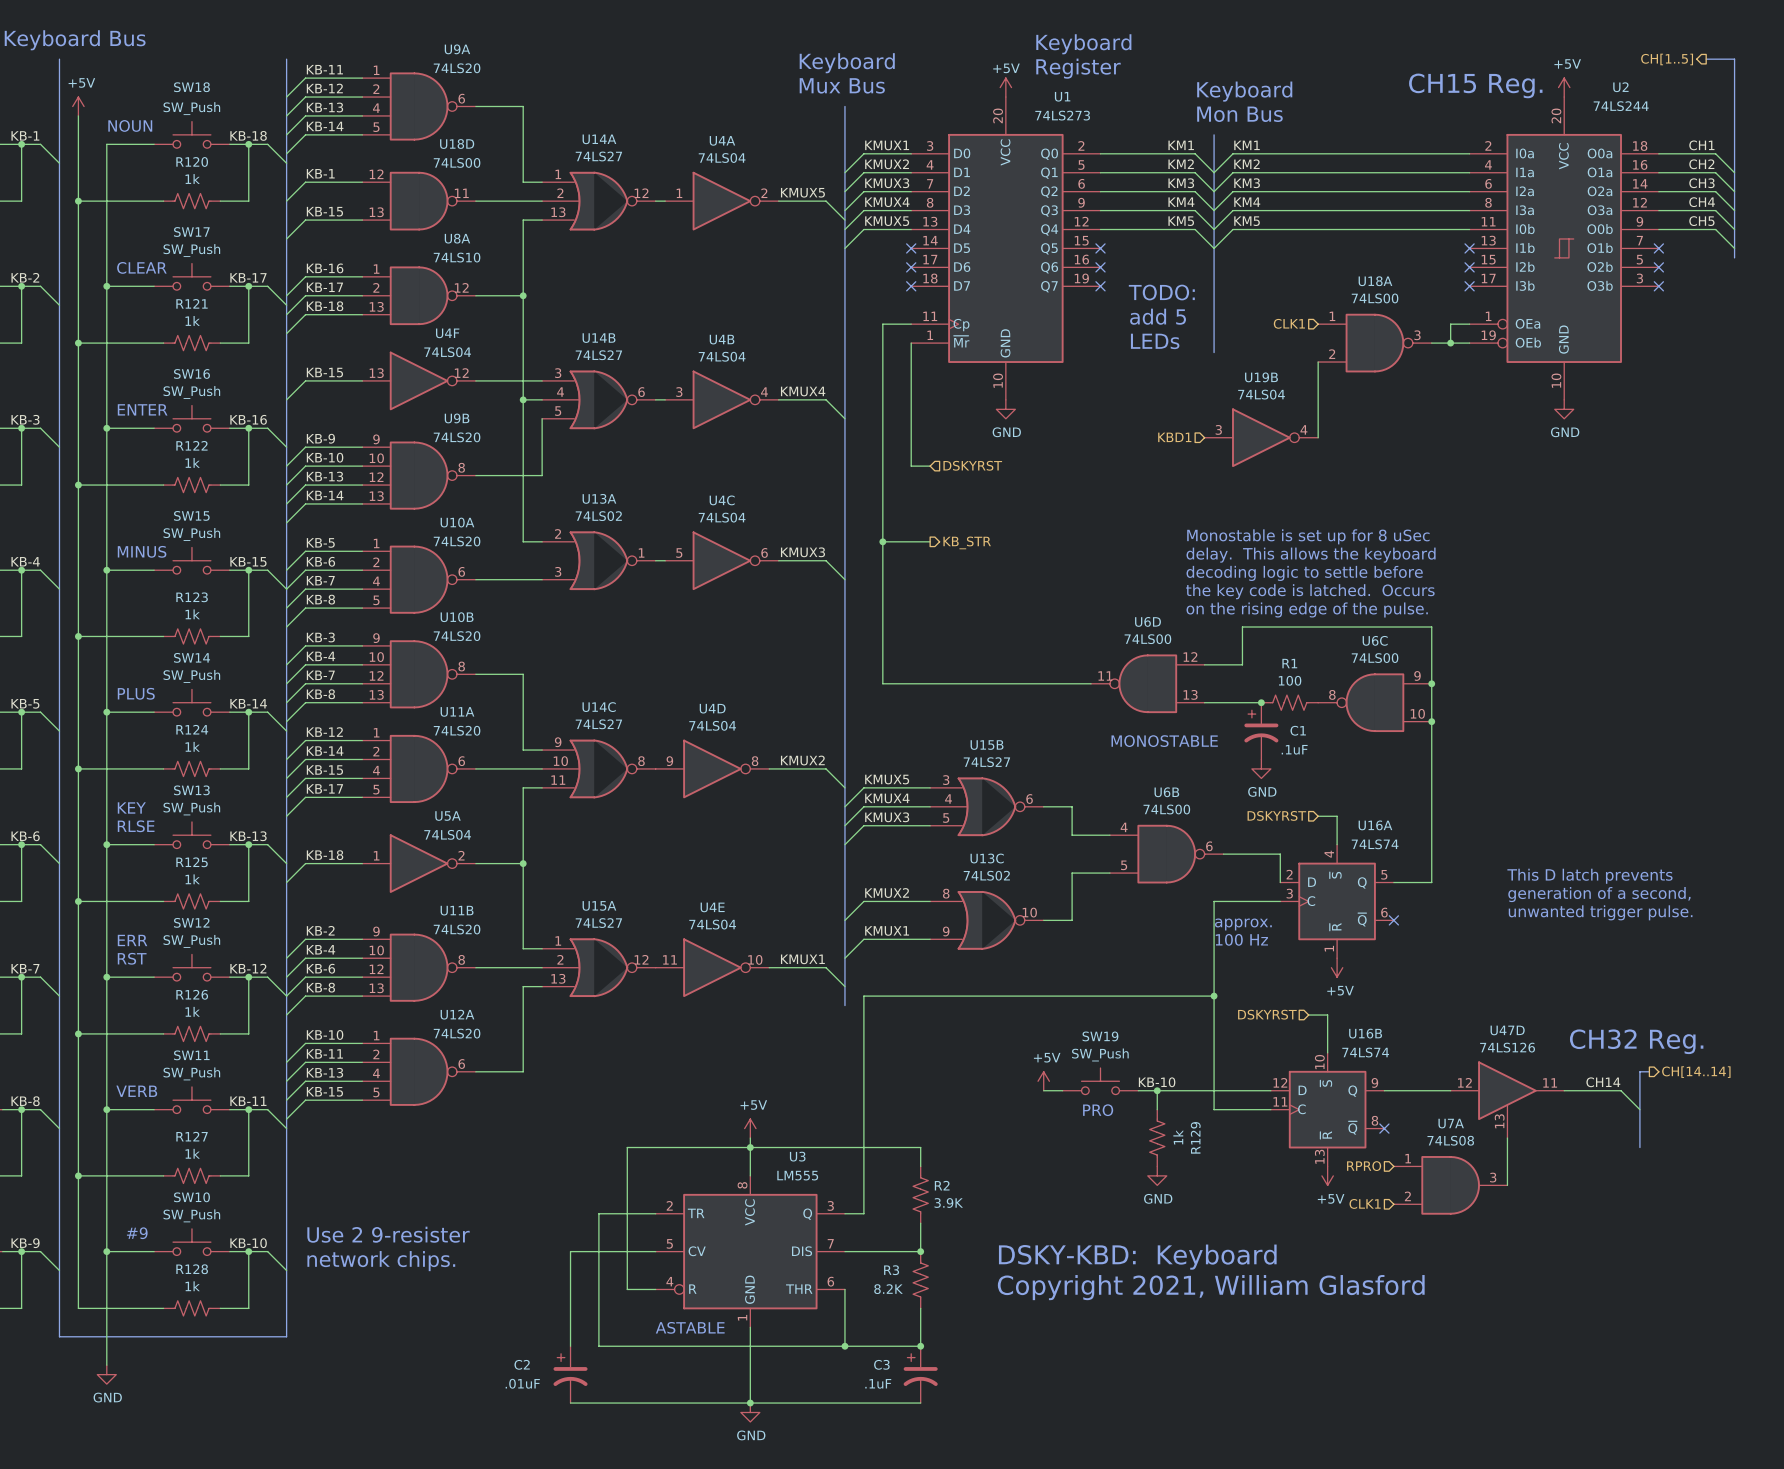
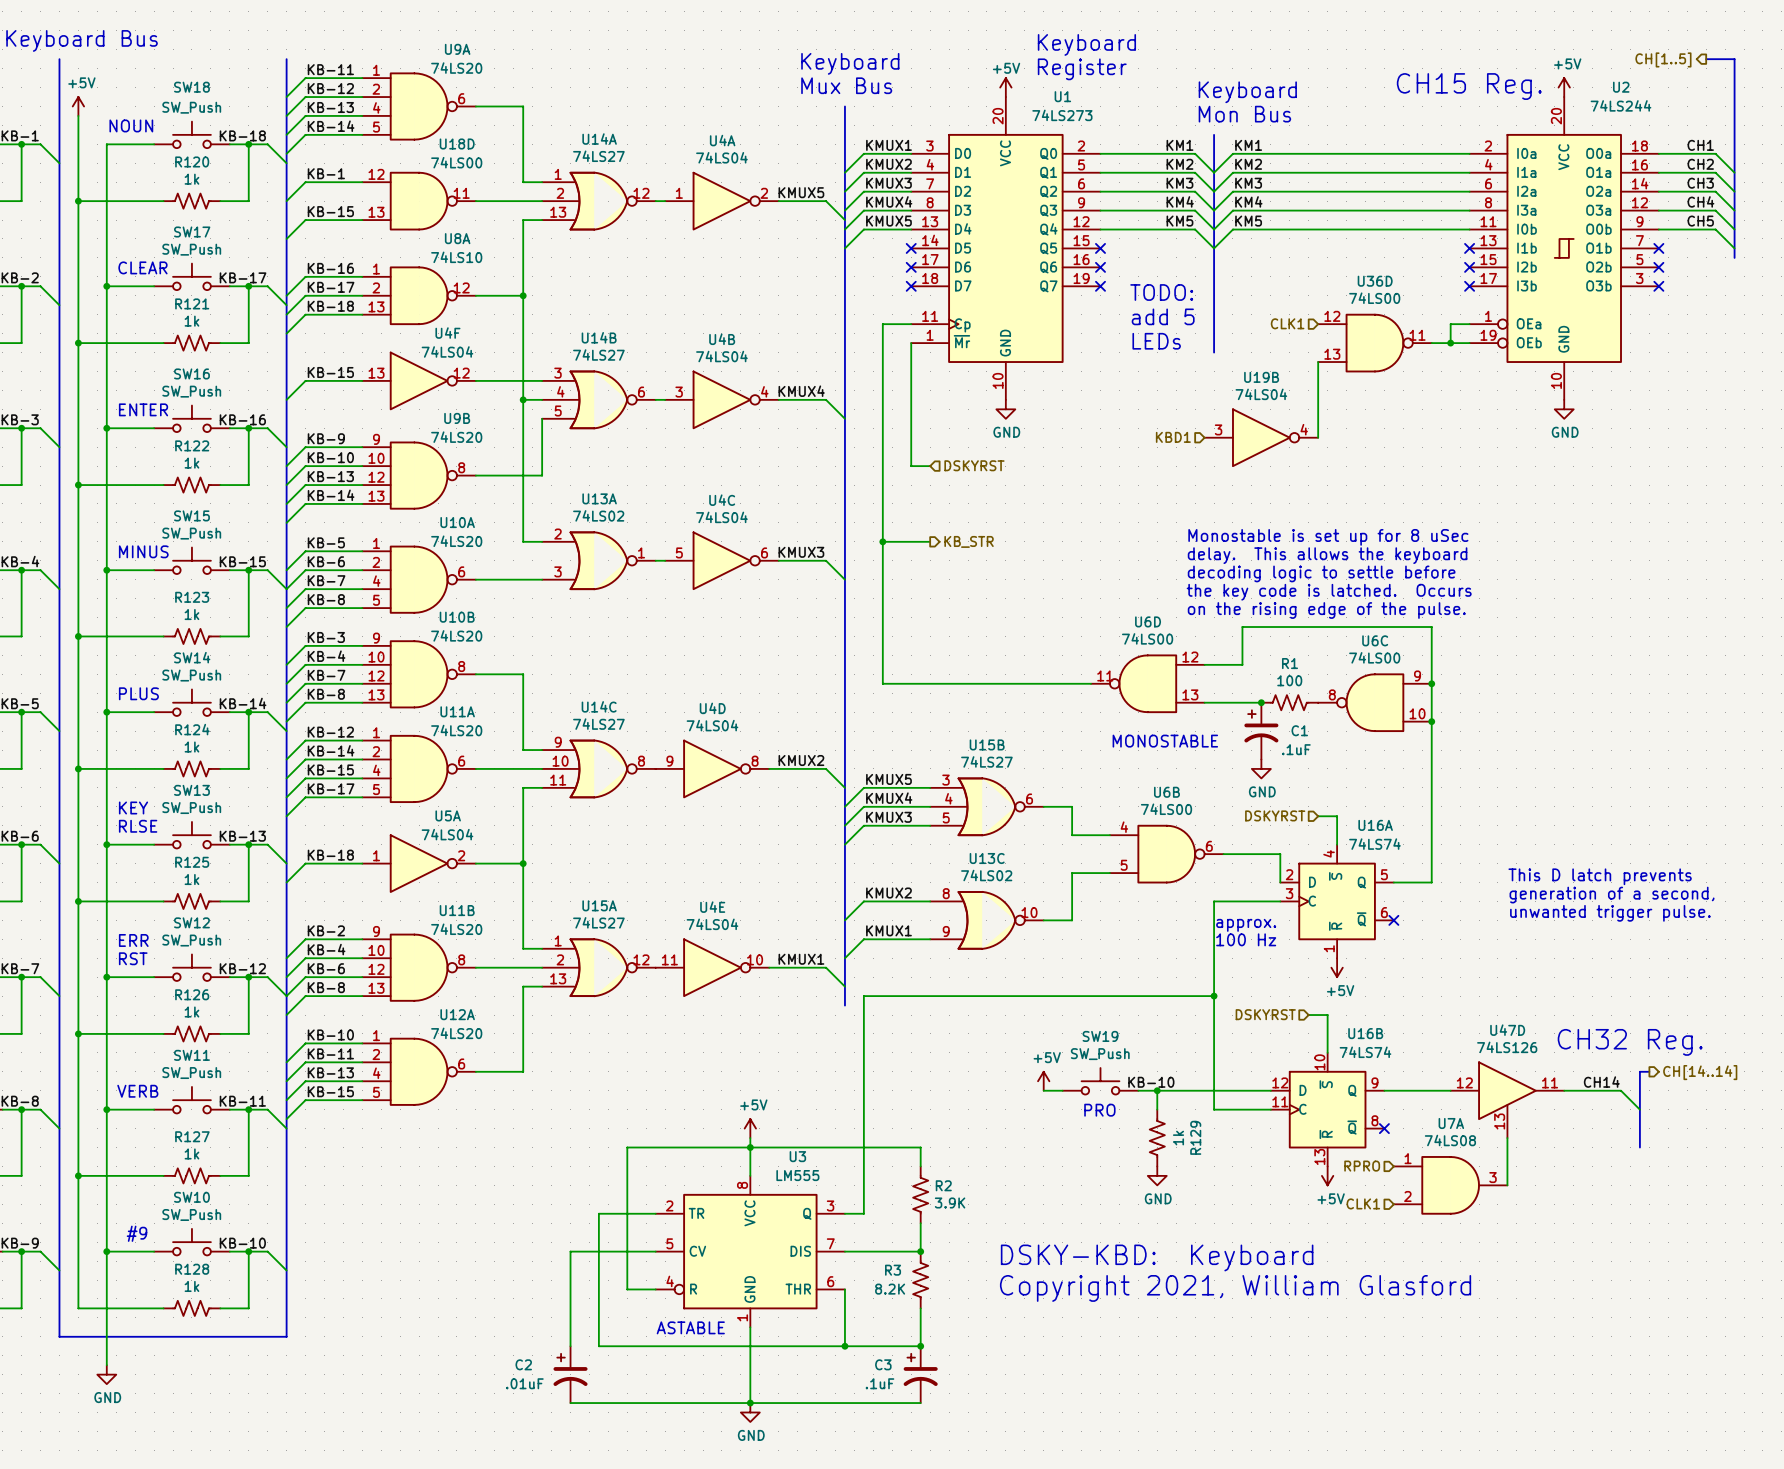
U18A name: U18A (1375, 281) -> U36D (1375, 281)
U18A pin number: 1 (1332, 316) -> 12 (1332, 316)
U18A pin number: 3 (1417, 335) -> 11 (1417, 335)
U18A pin number: 2 (1332, 354) -> 13 (1332, 354)
text: Use 2 9-resister (388, 1234) -> none
text: network chips. (381, 1261) -> none

